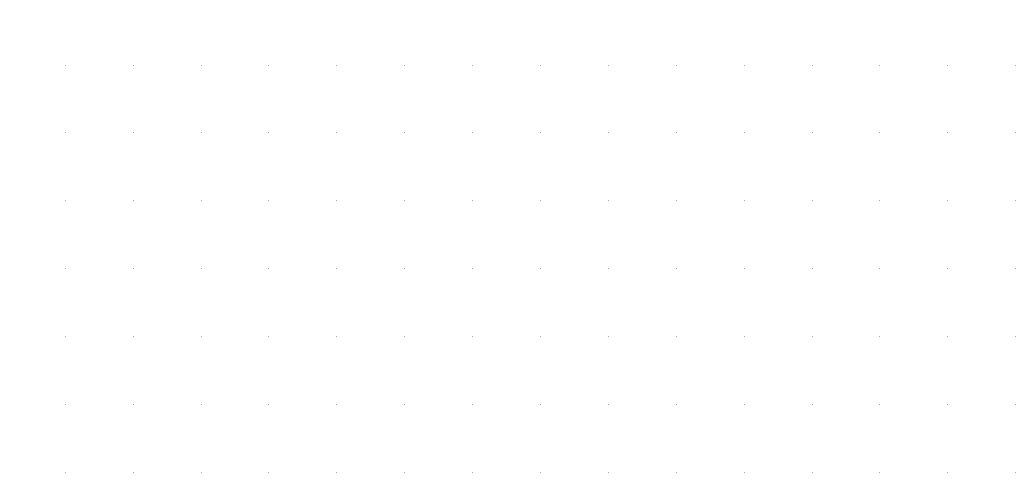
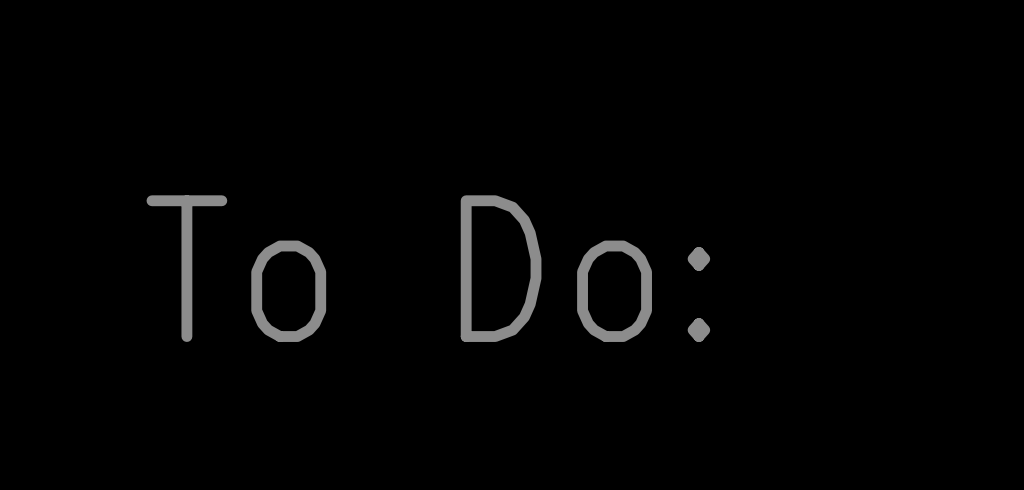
text: none -> To Do: (428, 268)

